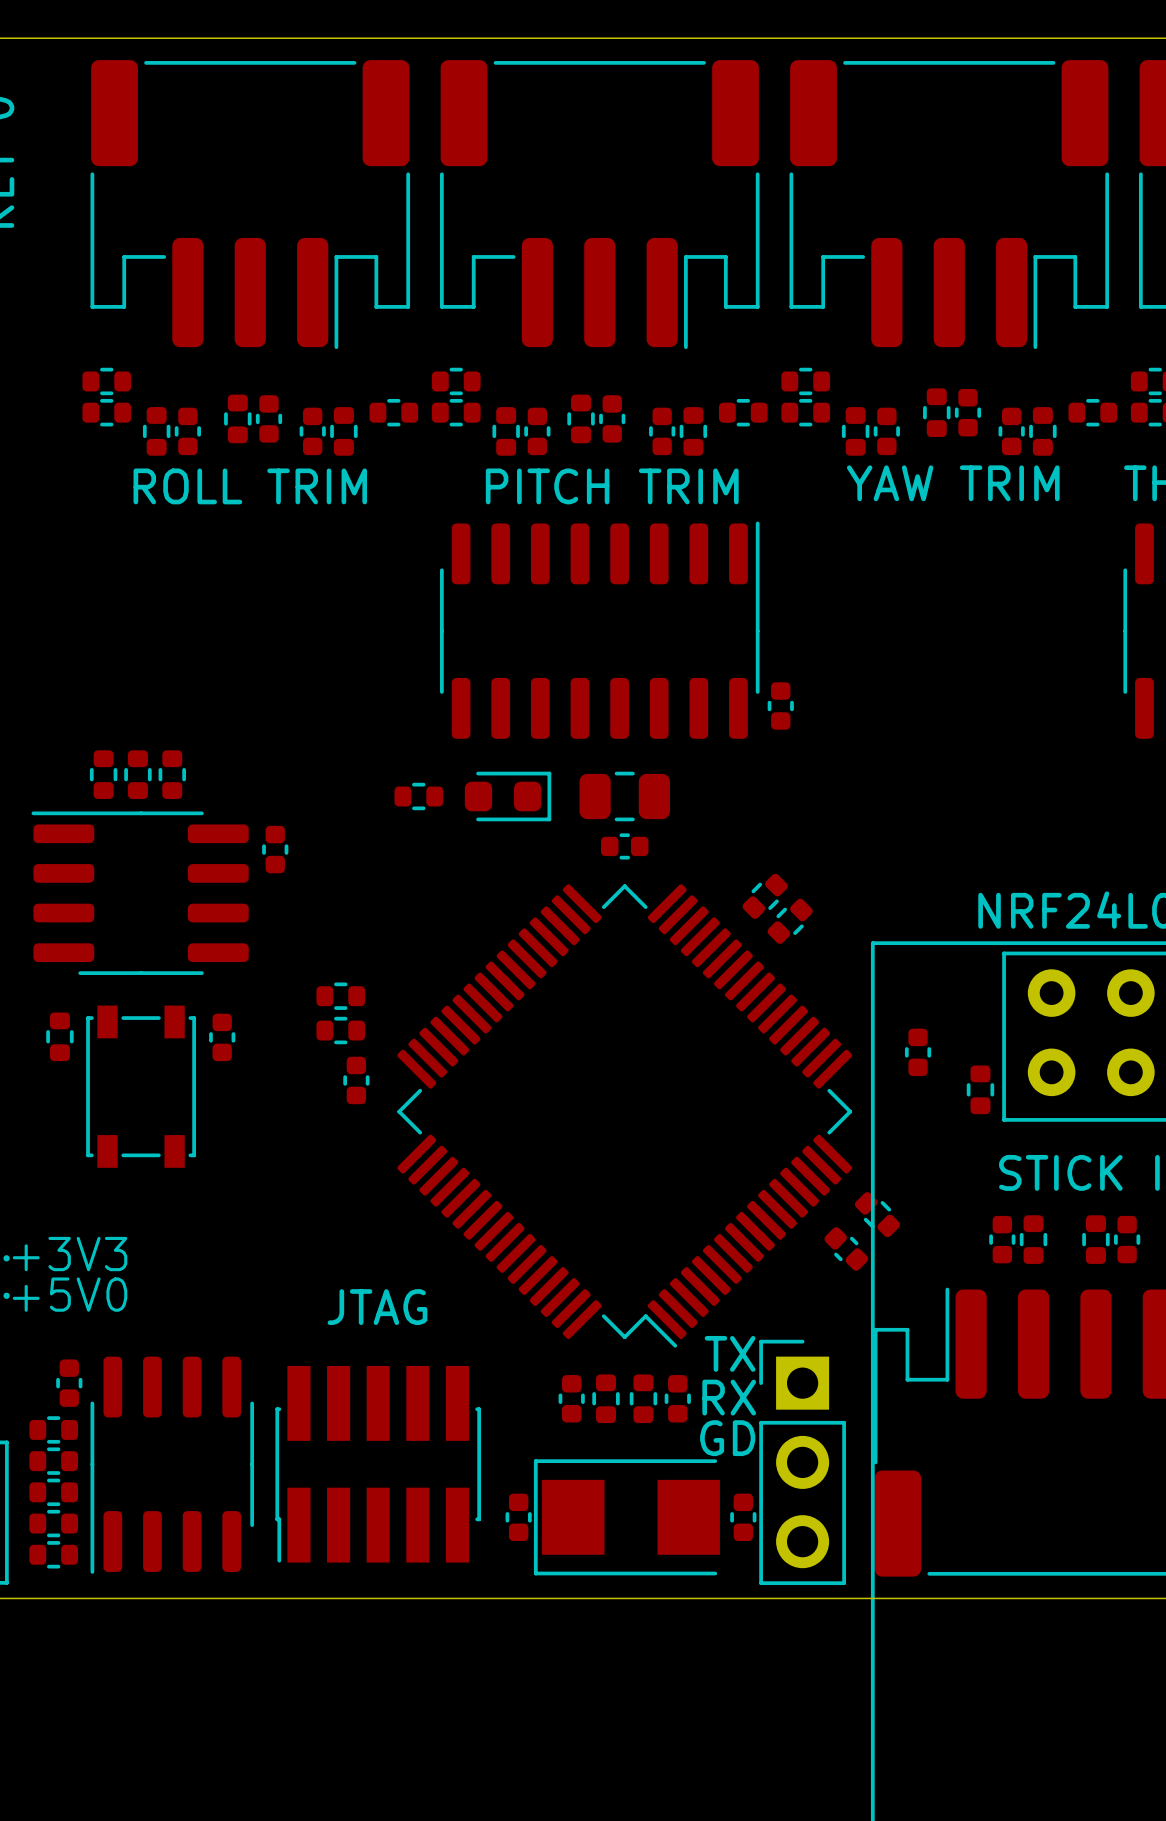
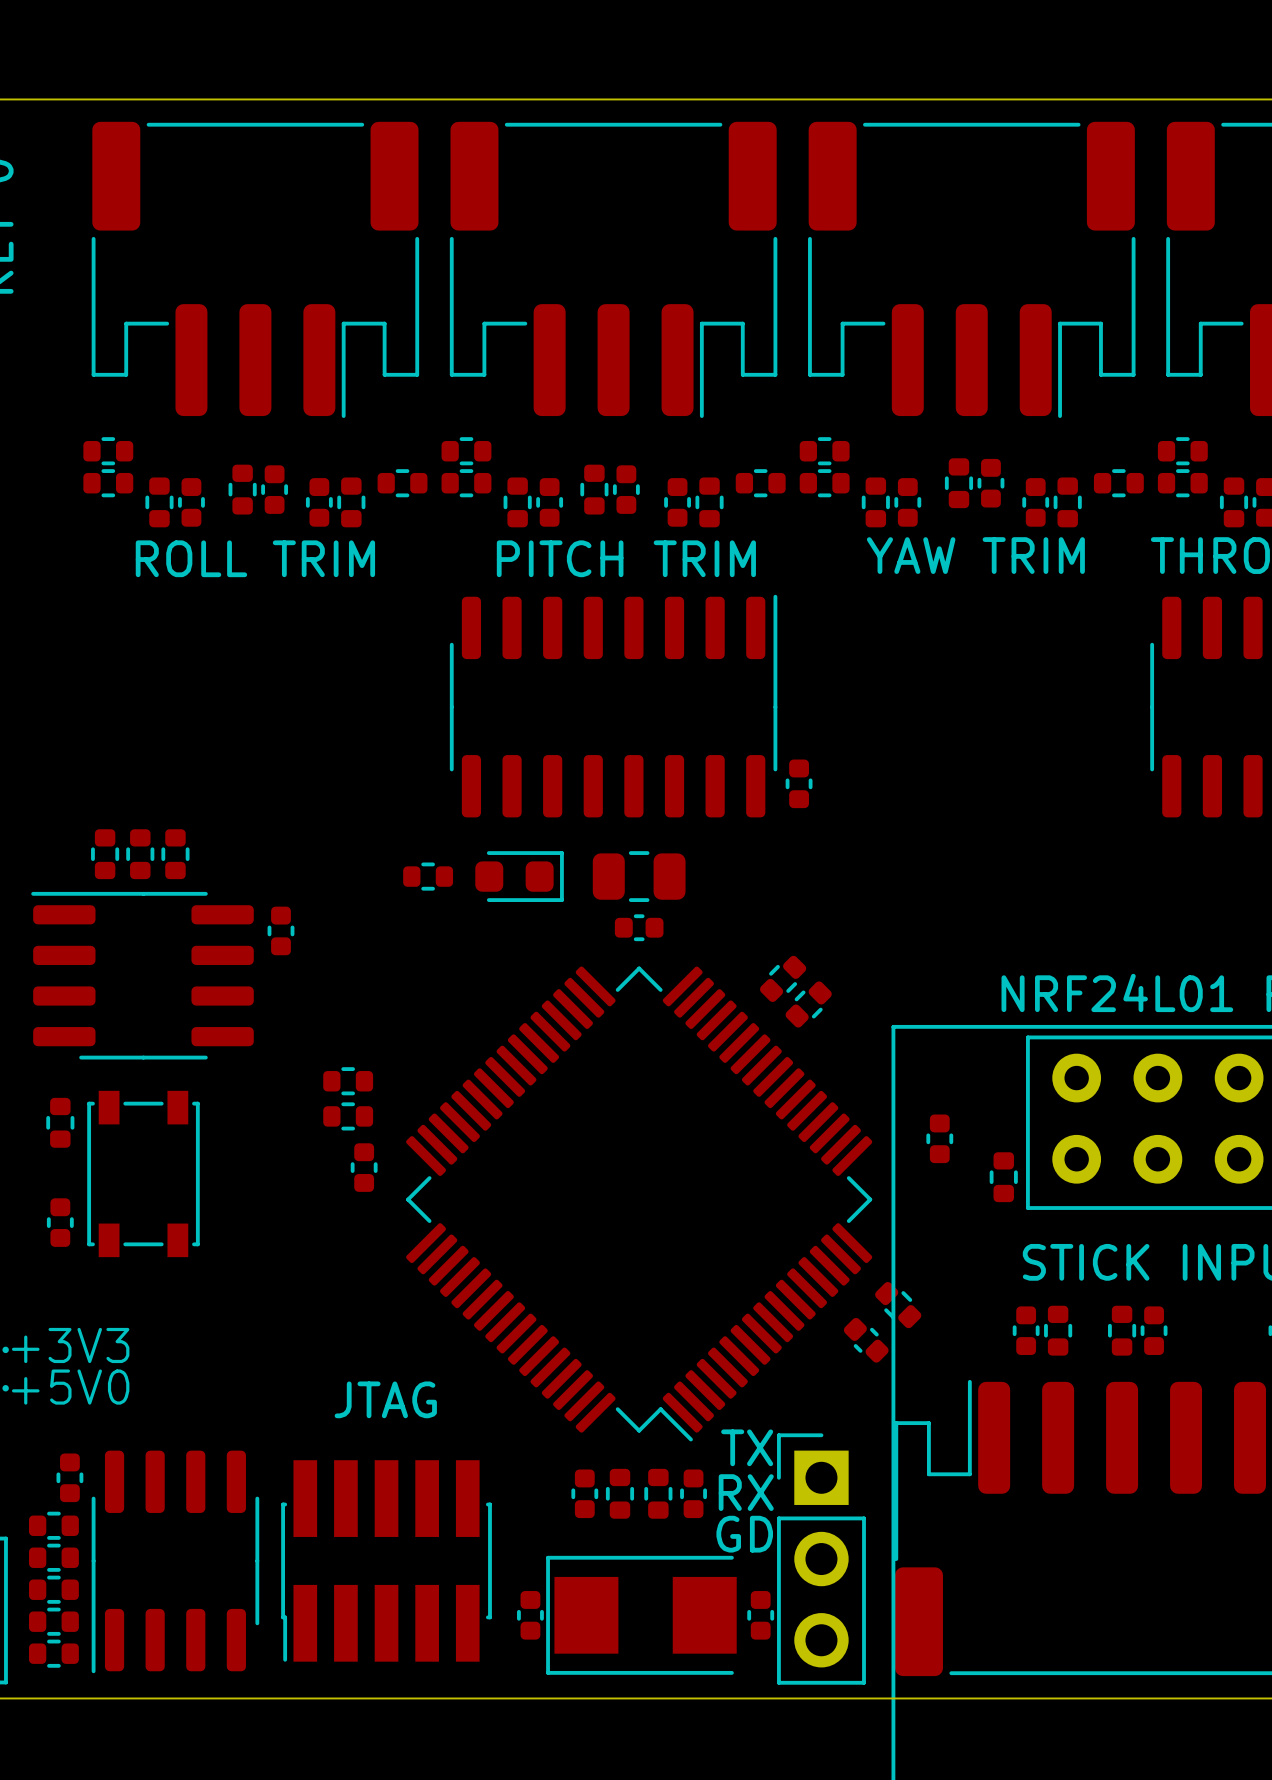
part position: (222, 1037) -> (60, 1222)

